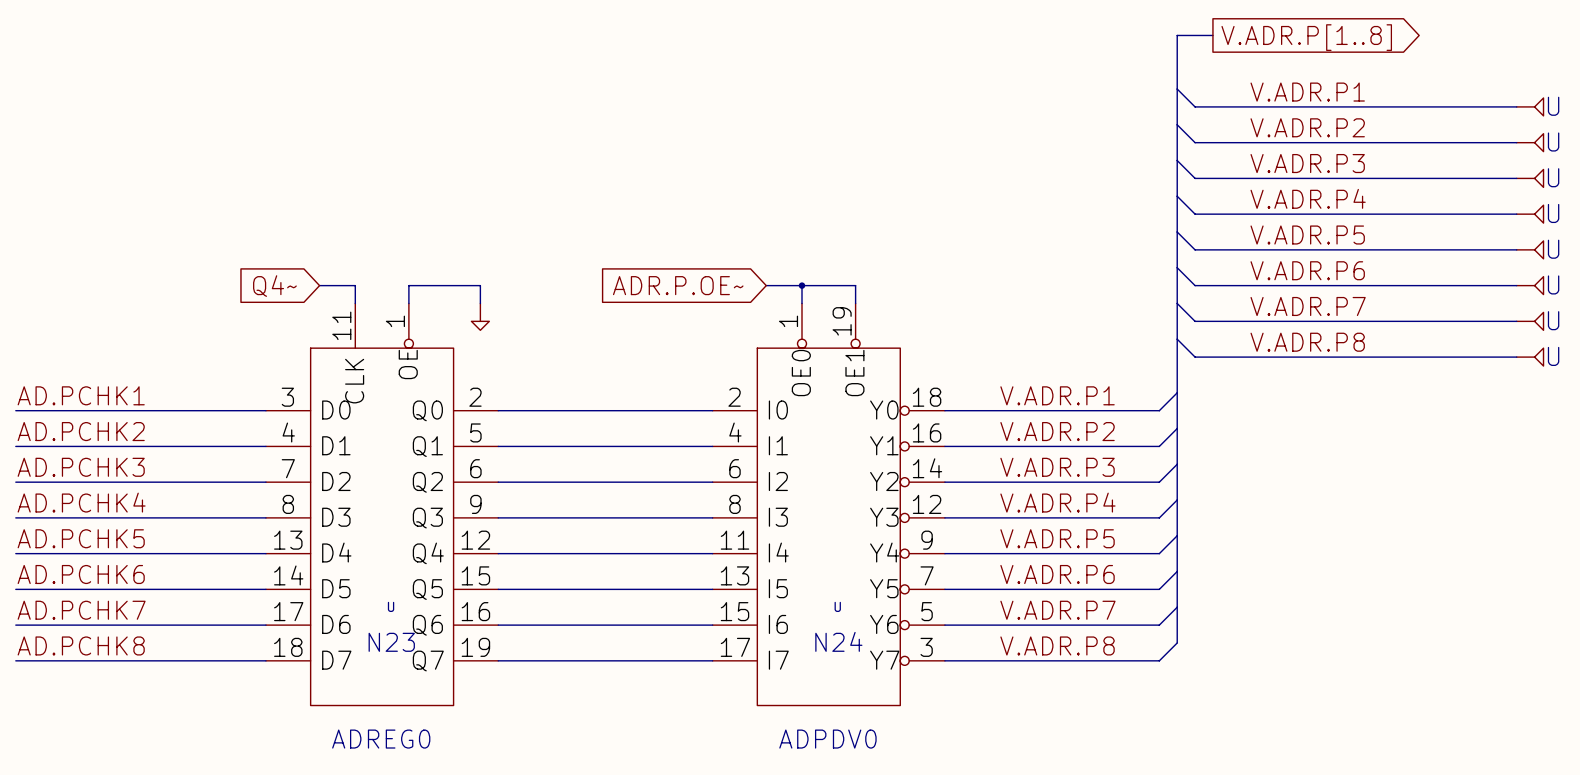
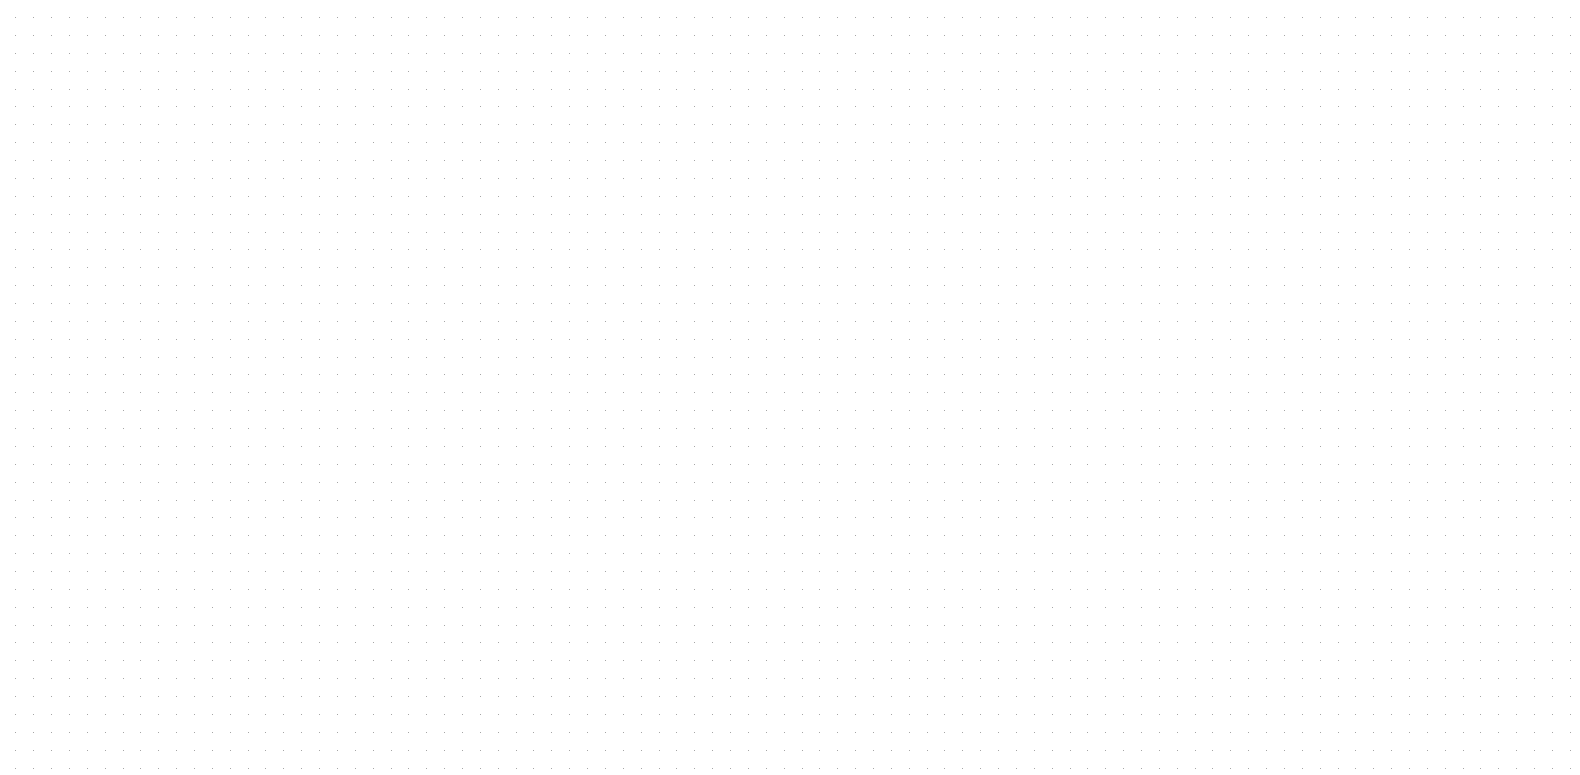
bus: (1212, 35) (1177, 35) (1177, 642) -> none
global label: V.ADR.P[1..8] (1306, 37) -> none
wire: (1177, 89) (1195, 106) (1516, 106) -> none
label: V.ADR.P1 (1307, 92) -> none
U: (1530, 106) -> none
wire: (1177, 124) (1195, 142) (1516, 142) -> none
label: V.ADR.P2 (1307, 127) -> none
U: (1530, 142) -> none
wire: (1177, 160) (1195, 178) (1516, 178) -> none
label: V.ADR.P3 (1307, 163) -> none
U: (1530, 178) -> none
wire: (1177, 196) (1195, 214) (1516, 214) -> none
label: V.ADR.P4 (1308, 198) -> none
U: (1530, 214) -> none
wire: (1177, 232) (1195, 249) (1516, 249) -> none
label: V.ADR.P5 (1307, 235) -> none
U: (1530, 249) -> none
wire: (1177, 267) (1195, 285) (1516, 285) -> none
label: V.ADR.P6 (1307, 270) -> none
wire: (319, 285) (355, 285) (355, 303) -> none
global label: ADR.P.OE~ (678, 285) -> none
wire: (766, 285) (855, 285) (855, 303) -> none
wire: (802, 285) (802, 303) -> none
junction: (802, 285) -> none
U: (1530, 285) -> none
global label: Q4~ (274, 286) -> none
wire: (408, 303) (408, 285) (480, 285) (480, 303) -> none
wire: (1177, 303) (1195, 321) (1516, 321) -> none
label: V.ADR.P7 (1308, 306) -> none
power symbol: (480, 317) -> none
U: (1530, 321) -> none
wire: (1177, 339) (1195, 357) (1516, 357) -> none
label: V.ADR.P8 (1307, 342) -> none
U: (1530, 357) -> none
wire: (1177, 392) (1159, 410) (944, 410) -> none
label: AD.PCHK1 (81, 395) -> none
label: V.ADR.P1 (1057, 395) -> none
wire: (15, 410) (265, 410) -> none
wire: (498, 410) (712, 410) -> none
wire: (1177, 428) (1159, 446) (944, 446) -> none
label: AD.PCHK2 (81, 431) -> none
label: V.ADR.P2 (1057, 431) -> none
wire: (15, 446) (265, 446) -> none
wire: (498, 446) (712, 446) -> none
wire: (1177, 464) (1159, 482) (944, 482) -> none
label: AD.PCHK3 (81, 467) -> none
label: V.ADR.P3 (1057, 467) -> none
wire: (15, 482) (265, 482) -> none
wire: (498, 482) (712, 482) -> none
wire: (1177, 500) (1159, 517) (944, 517) -> none
label: AD.PCHK4 (81, 502) -> none
label: V.ADR.P4 (1057, 502) -> none
U: (382, 504) -> none
U: (828, 504) -> none
wire: (15, 517) (265, 517) -> none
wire: (498, 517) (712, 517) -> none
wire: (1177, 535) (1159, 553) (944, 553) -> none
label: AD.PCHK5 (81, 538) -> none
label: V.ADR.P5 (1057, 538) -> none
wire: (15, 553) (265, 553) -> none
wire: (498, 553) (712, 553) -> none
wire: (1177, 571) (1159, 589) (944, 589) -> none
label: AD.PCHK6 (81, 574) -> none
label: V.ADR.P6 (1057, 574) -> none
wire: (15, 589) (265, 589) -> none
wire: (498, 589) (712, 589) -> none
wire: (1177, 607) (1159, 625) (944, 625) -> none
label: AD.PCHK7 (81, 610) -> none
label: V.ADR.P7 (1057, 610) -> none
wire: (15, 625) (265, 625) -> none
wire: (498, 625) (712, 625) -> none
wire: (1177, 642) (1159, 660) (944, 660) -> none
label: AD.PCHK8 (81, 645) -> none
label: V.ADR.P8 (1057, 645) -> none
wire: (15, 660) (265, 660) -> none
wire: (498, 660) (712, 660) -> none

